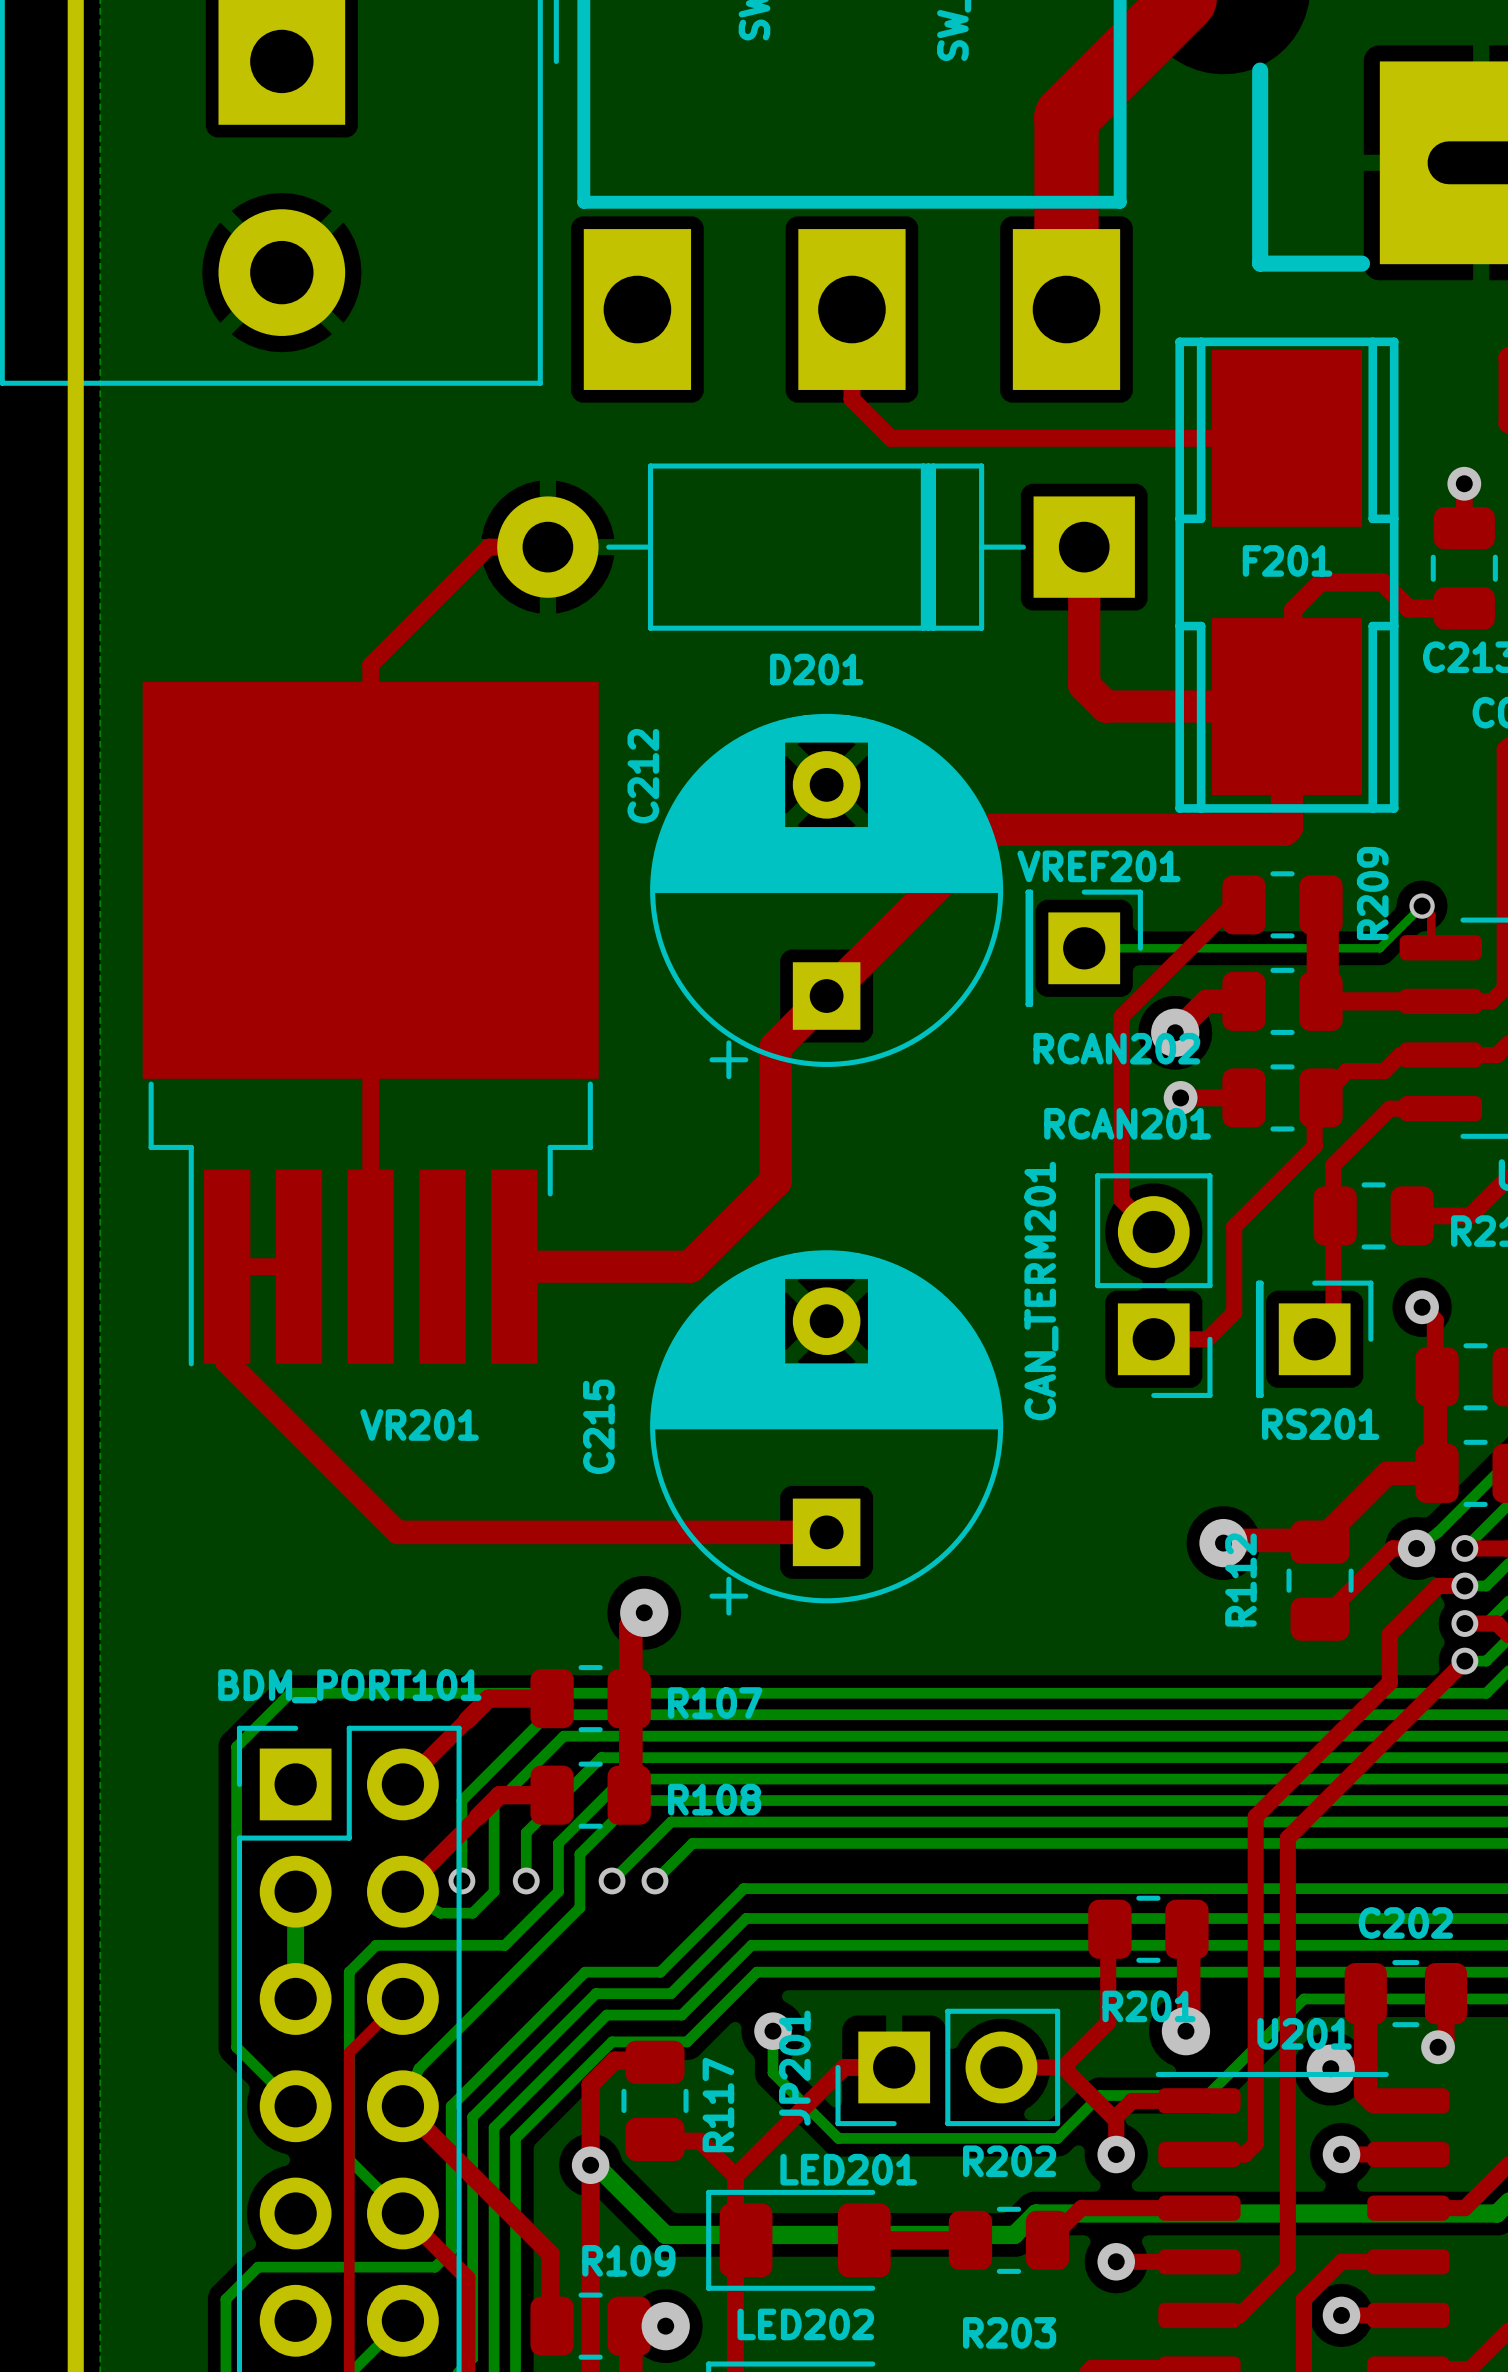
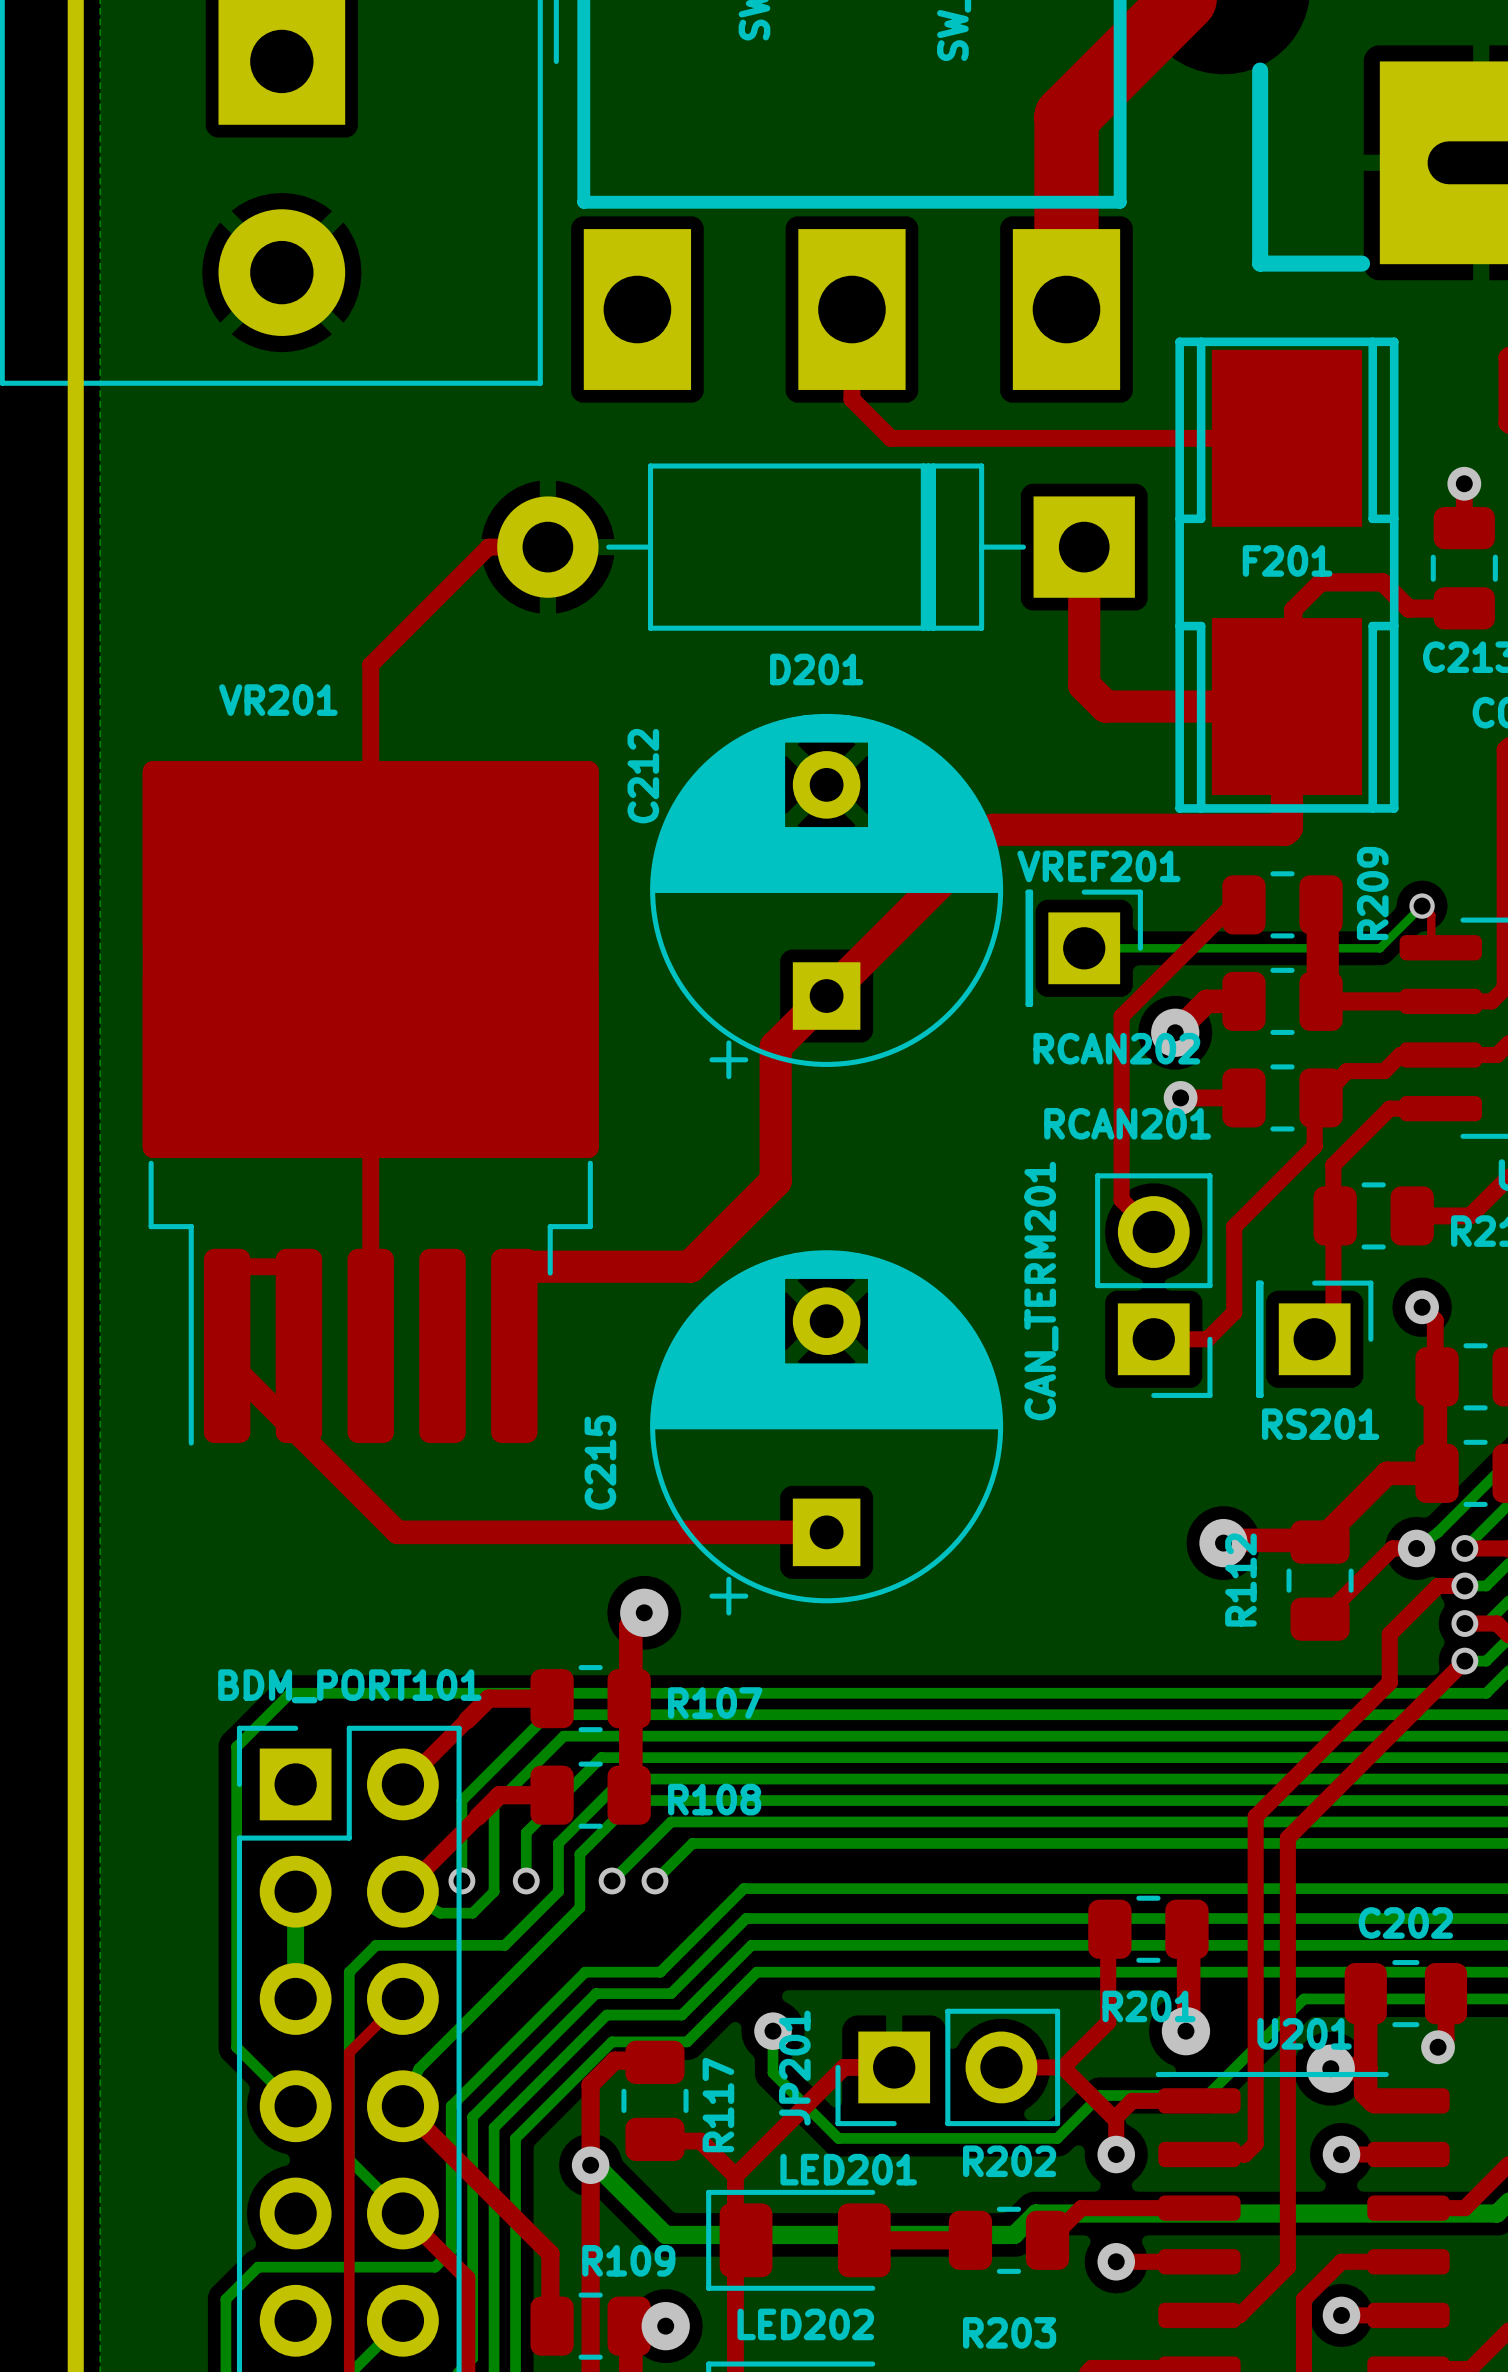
VR201 footprint: [142, 681, 599, 1367] -> [142, 761, 599, 1446]
VR201 name position: VR201 (419, 1424) -> VR201 (278, 700)
C215 name position: C215 (598, 1426) -> C215 (600, 1462)

